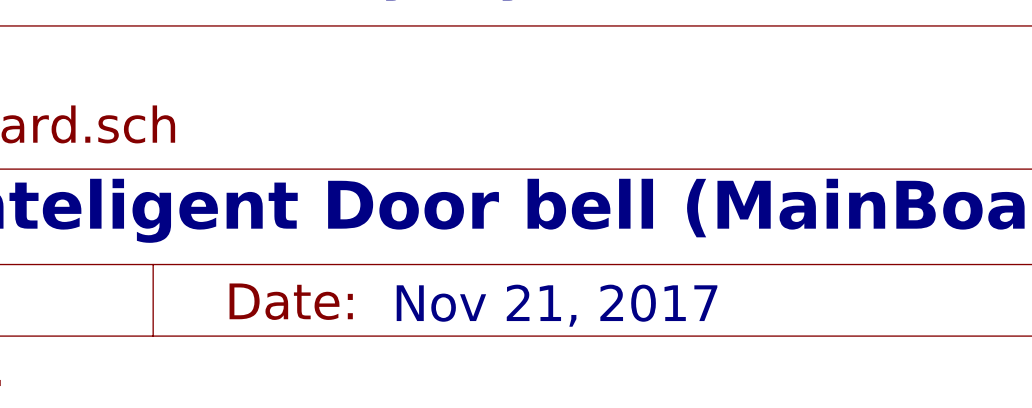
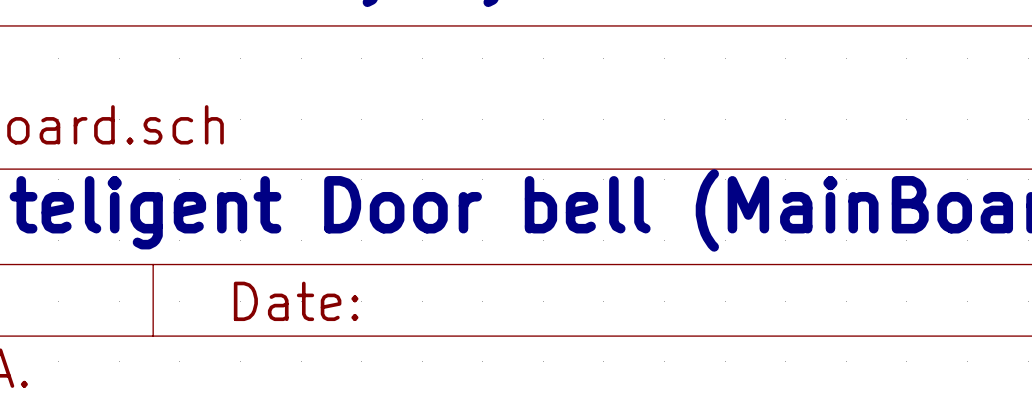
text: Nov 21, 2017 (557, 305) -> none

